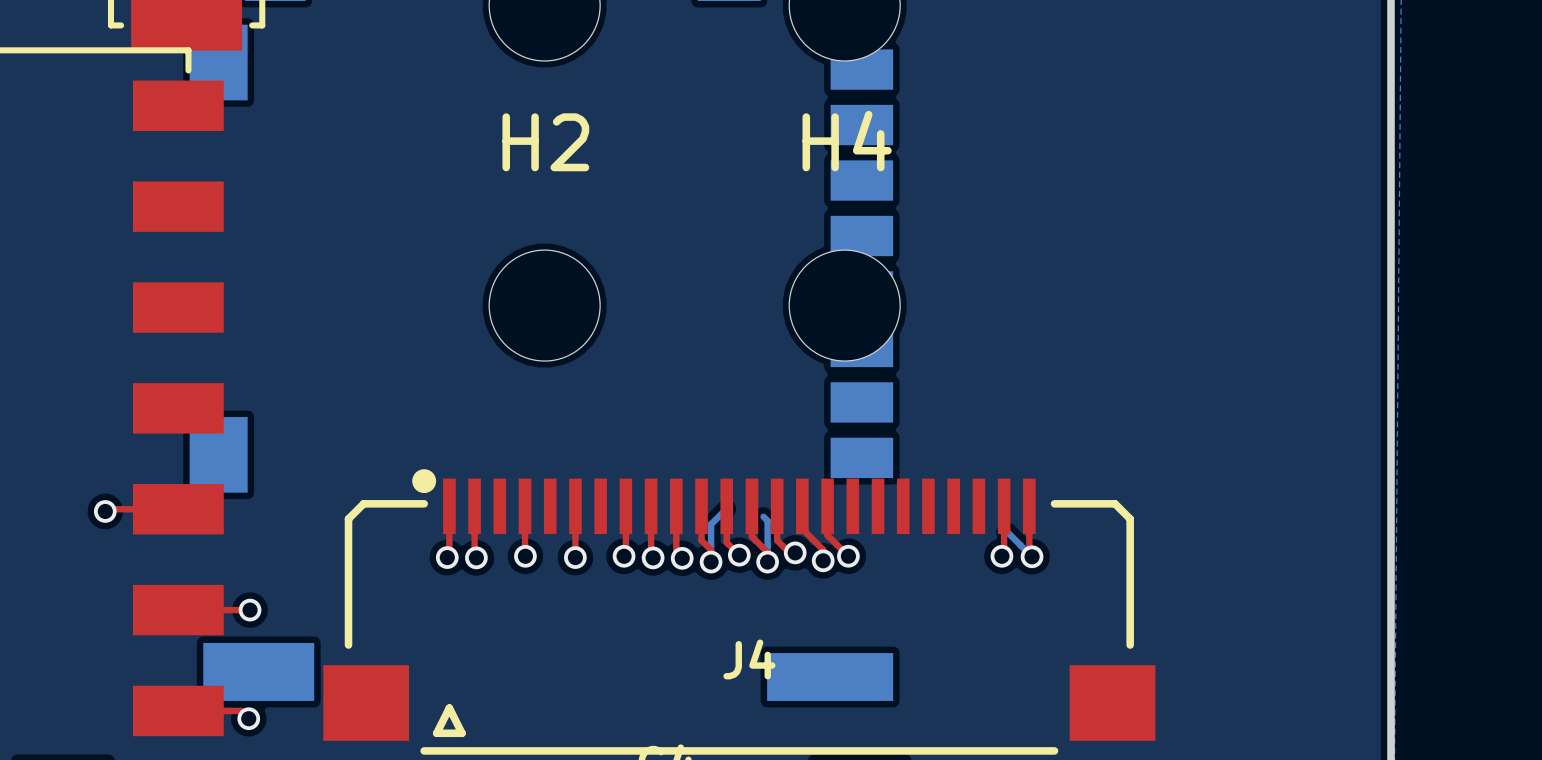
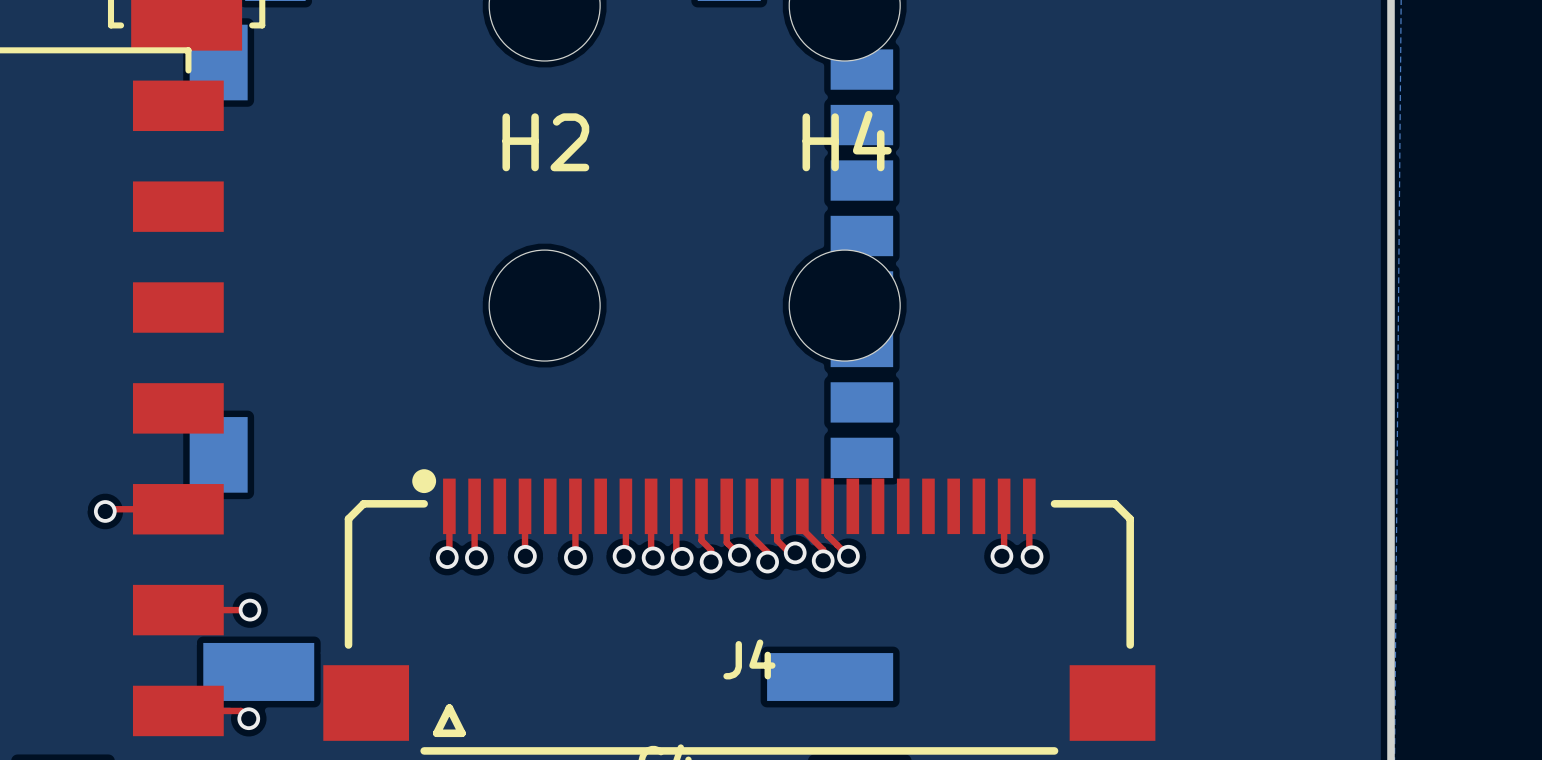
bottom track: (726, 508) (711, 524) (711, 562) -> none
bottom track: (763, 516) (767, 520) (767, 562) -> none
bottom track: (1005, 531) (1032, 556) -> none

